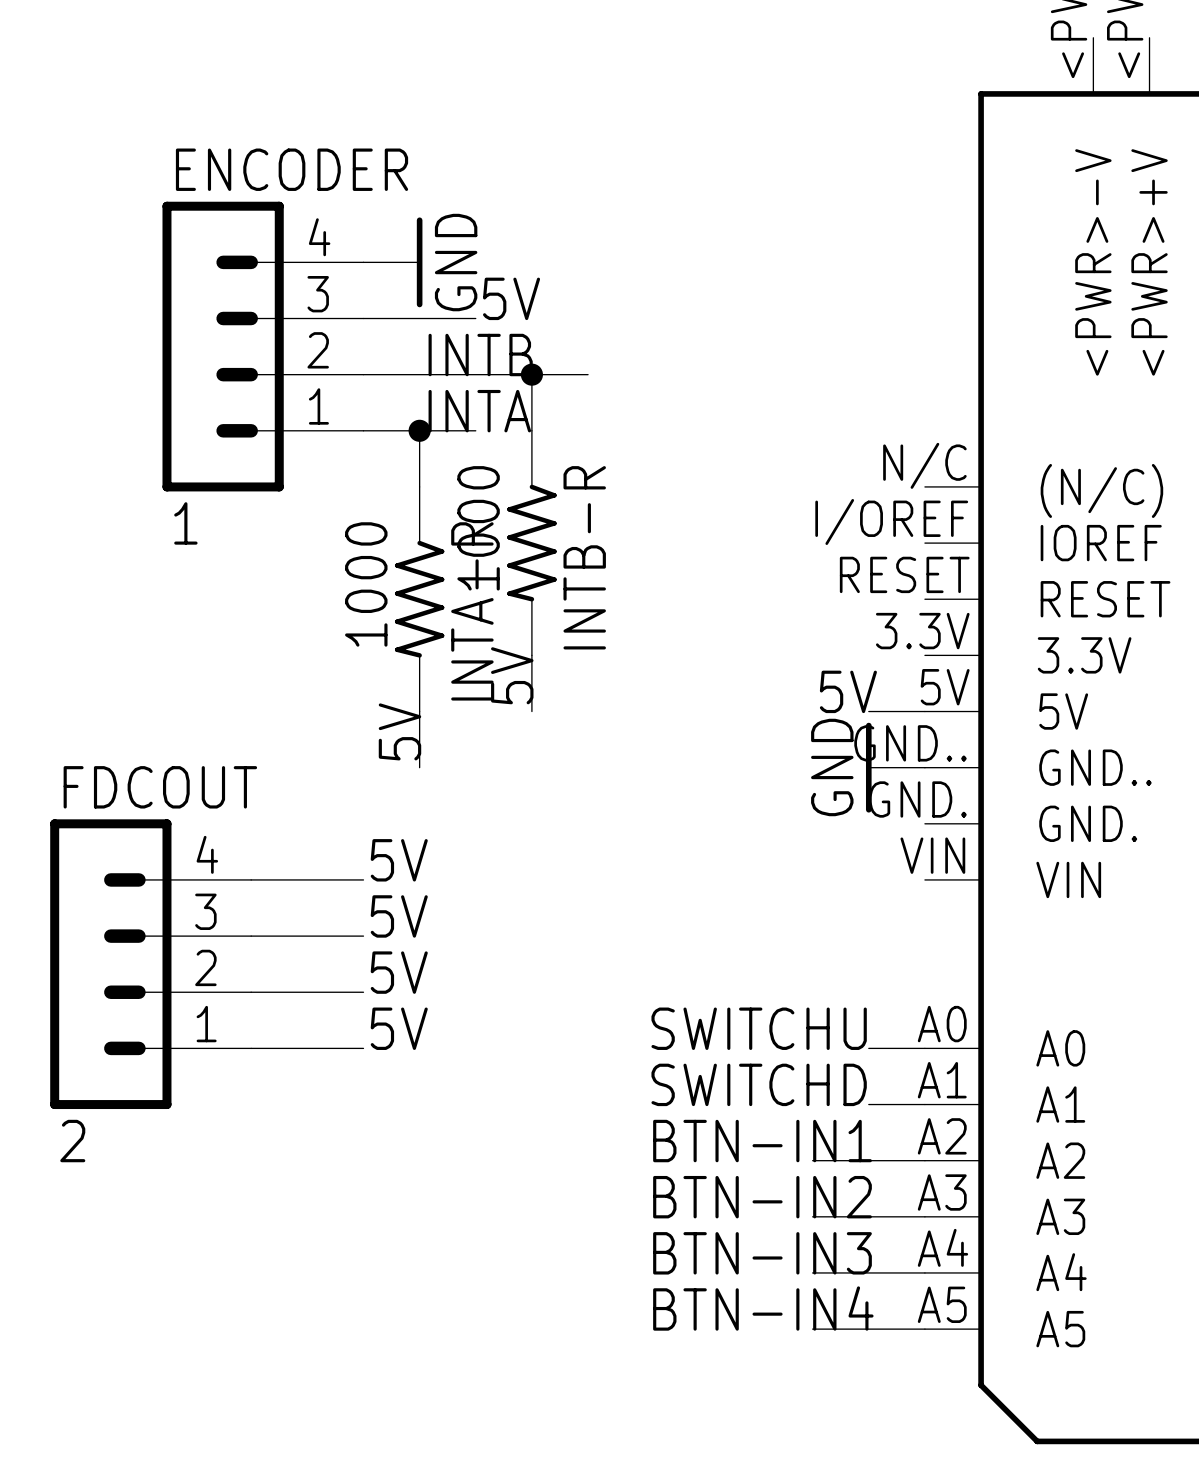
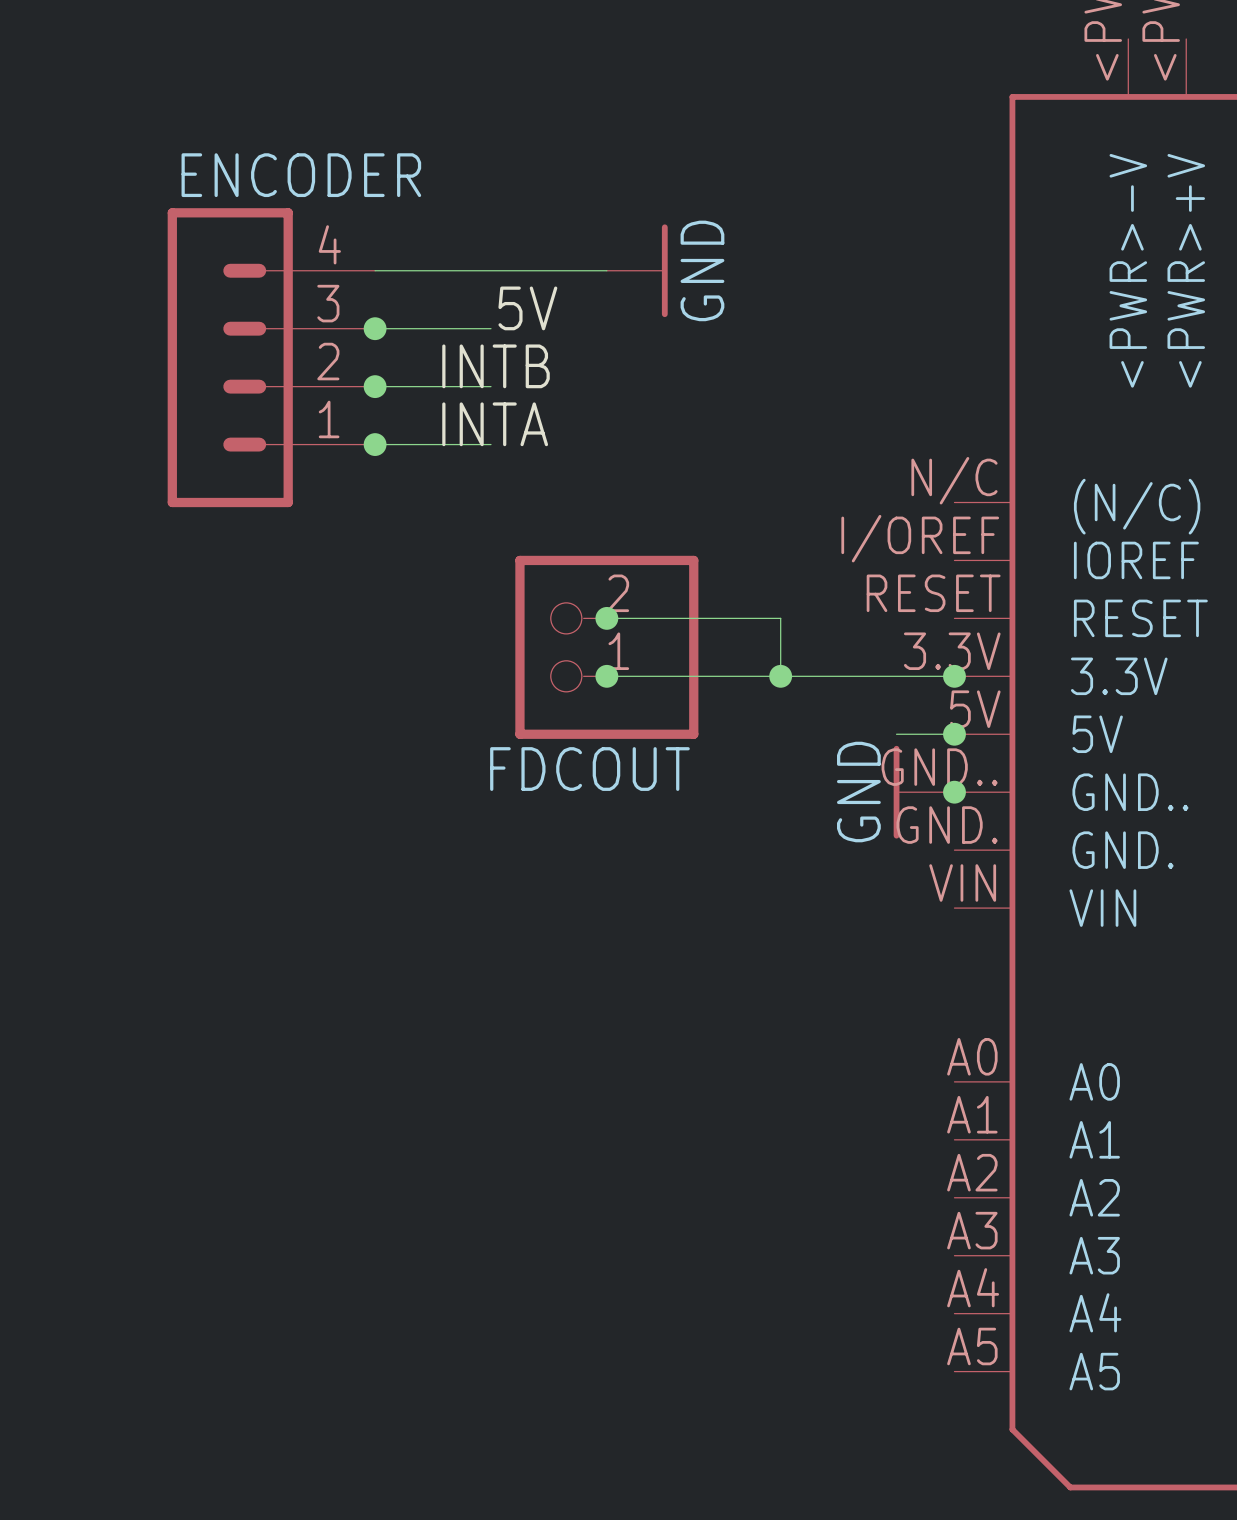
wire: none -> (375, 270) (606, 270)
power symbol position: GND (392, 262) -> GND (637, 270)
junction: none -> (375, 328)
junction: none -> (375, 386)
wire: (475, 374) (588, 374) -> none
wire: (531, 374) (531, 430) -> none
junction: (531, 374) -> none
junction: none -> (375, 444)
wire: (419, 430) (419, 486) -> none
junction: (419, 430) -> none
ENCODER value: 1 (185, 523) -> none
INTB-R: 1000 (531, 543) -> none
INTA-R: 1000 (419, 599) -> none
wire: none -> (606, 618) (780, 618) (780, 676)
junction: none -> (606, 618)
FDCOUT: none -> (606, 647)
wire: (531, 655) (531, 711) -> none
wire: none -> (606, 676) (954, 676)
junction: none -> (606, 676)
junction: none -> (780, 676)
junction: none -> (954, 676)
label: 5V (512, 675) -> none
label: 5V (848, 691) -> none
wire: (419, 711) (419, 767) -> none
junction: none -> (954, 734)
label: 5V (399, 731) -> none
junction: none -> (954, 792)
label: 5V (399, 860) -> none
wire: (251, 879) (363, 879) -> none
label: 5V (399, 916) -> none
wire: (251, 936) (363, 936) -> none
FDCOUT: 2 (150, 964) -> none
label: 5V (399, 972) -> none
wire: (251, 992) (363, 992) -> none
label: 5V (399, 1028) -> none
label: SWITCHU (759, 1028) -> none
wire: (251, 1048) (363, 1048) -> none
wire: (868, 1048) (924, 1048) -> none
label: SWITCHD (759, 1084) -> none
wire: (868, 1104) (924, 1104) -> none
label: BTN-IN1 (762, 1141) -> none
wire: (812, 1160) (924, 1160) -> none
label: BTN-IN2 (762, 1197) -> none
wire: (812, 1216) (924, 1216) -> none
label: BTN-IN3 (762, 1253) -> none
wire: (812, 1272) (924, 1272) -> none
label: BTN-IN4 (763, 1308) -> none
wire: (812, 1329) (924, 1329) -> none

